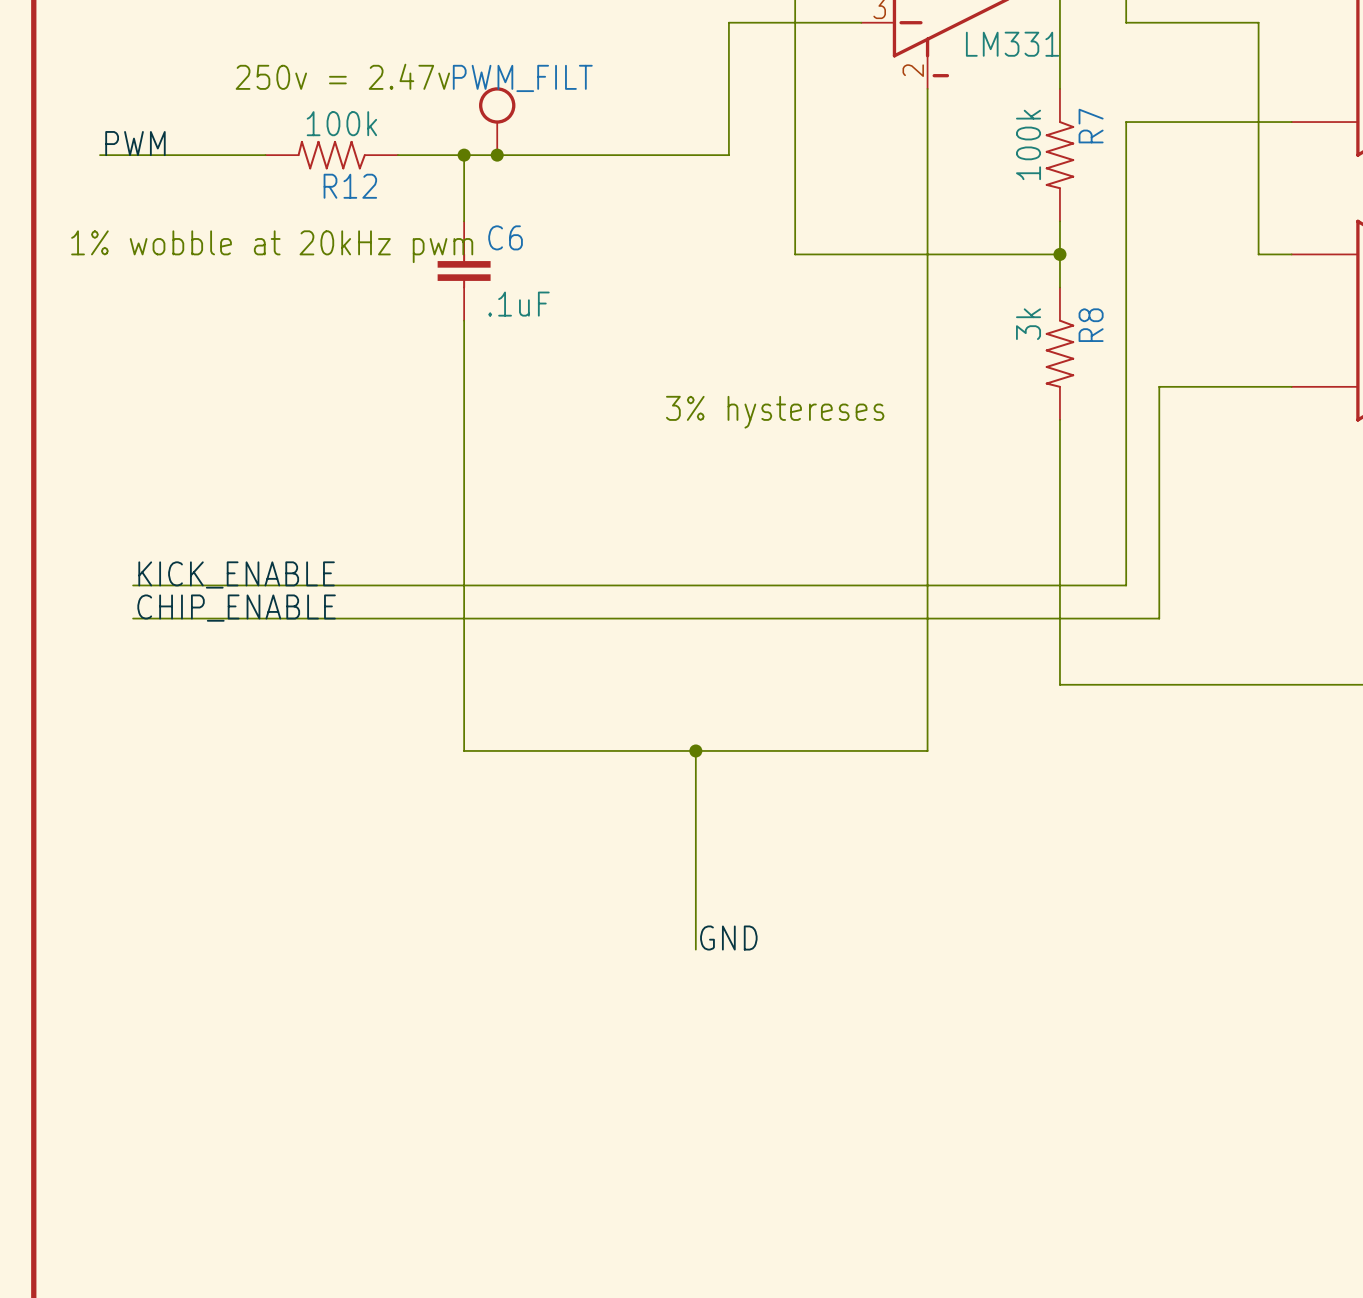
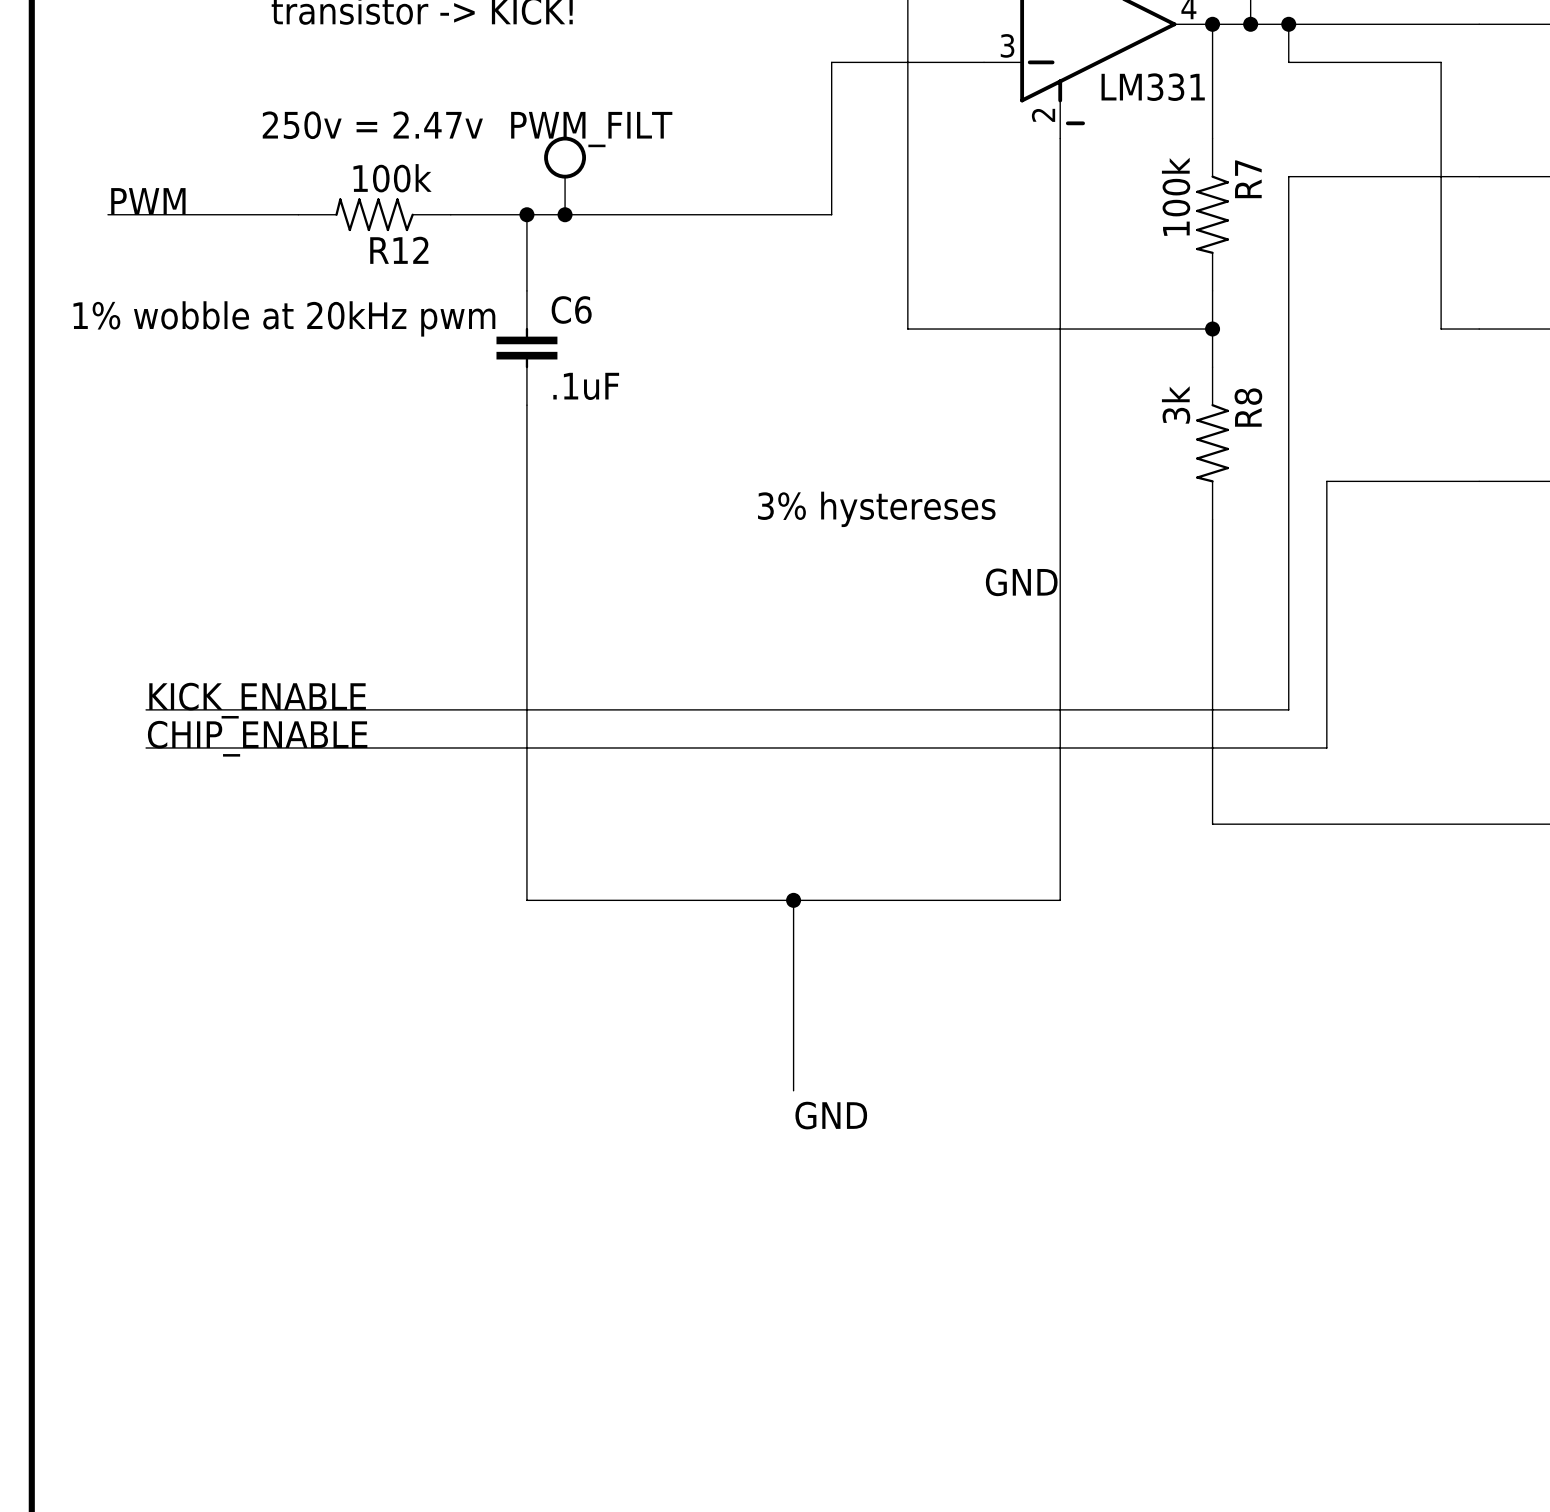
label: none -> GND (1021, 582)
wire: (695, 916) (695, 949) -> none

